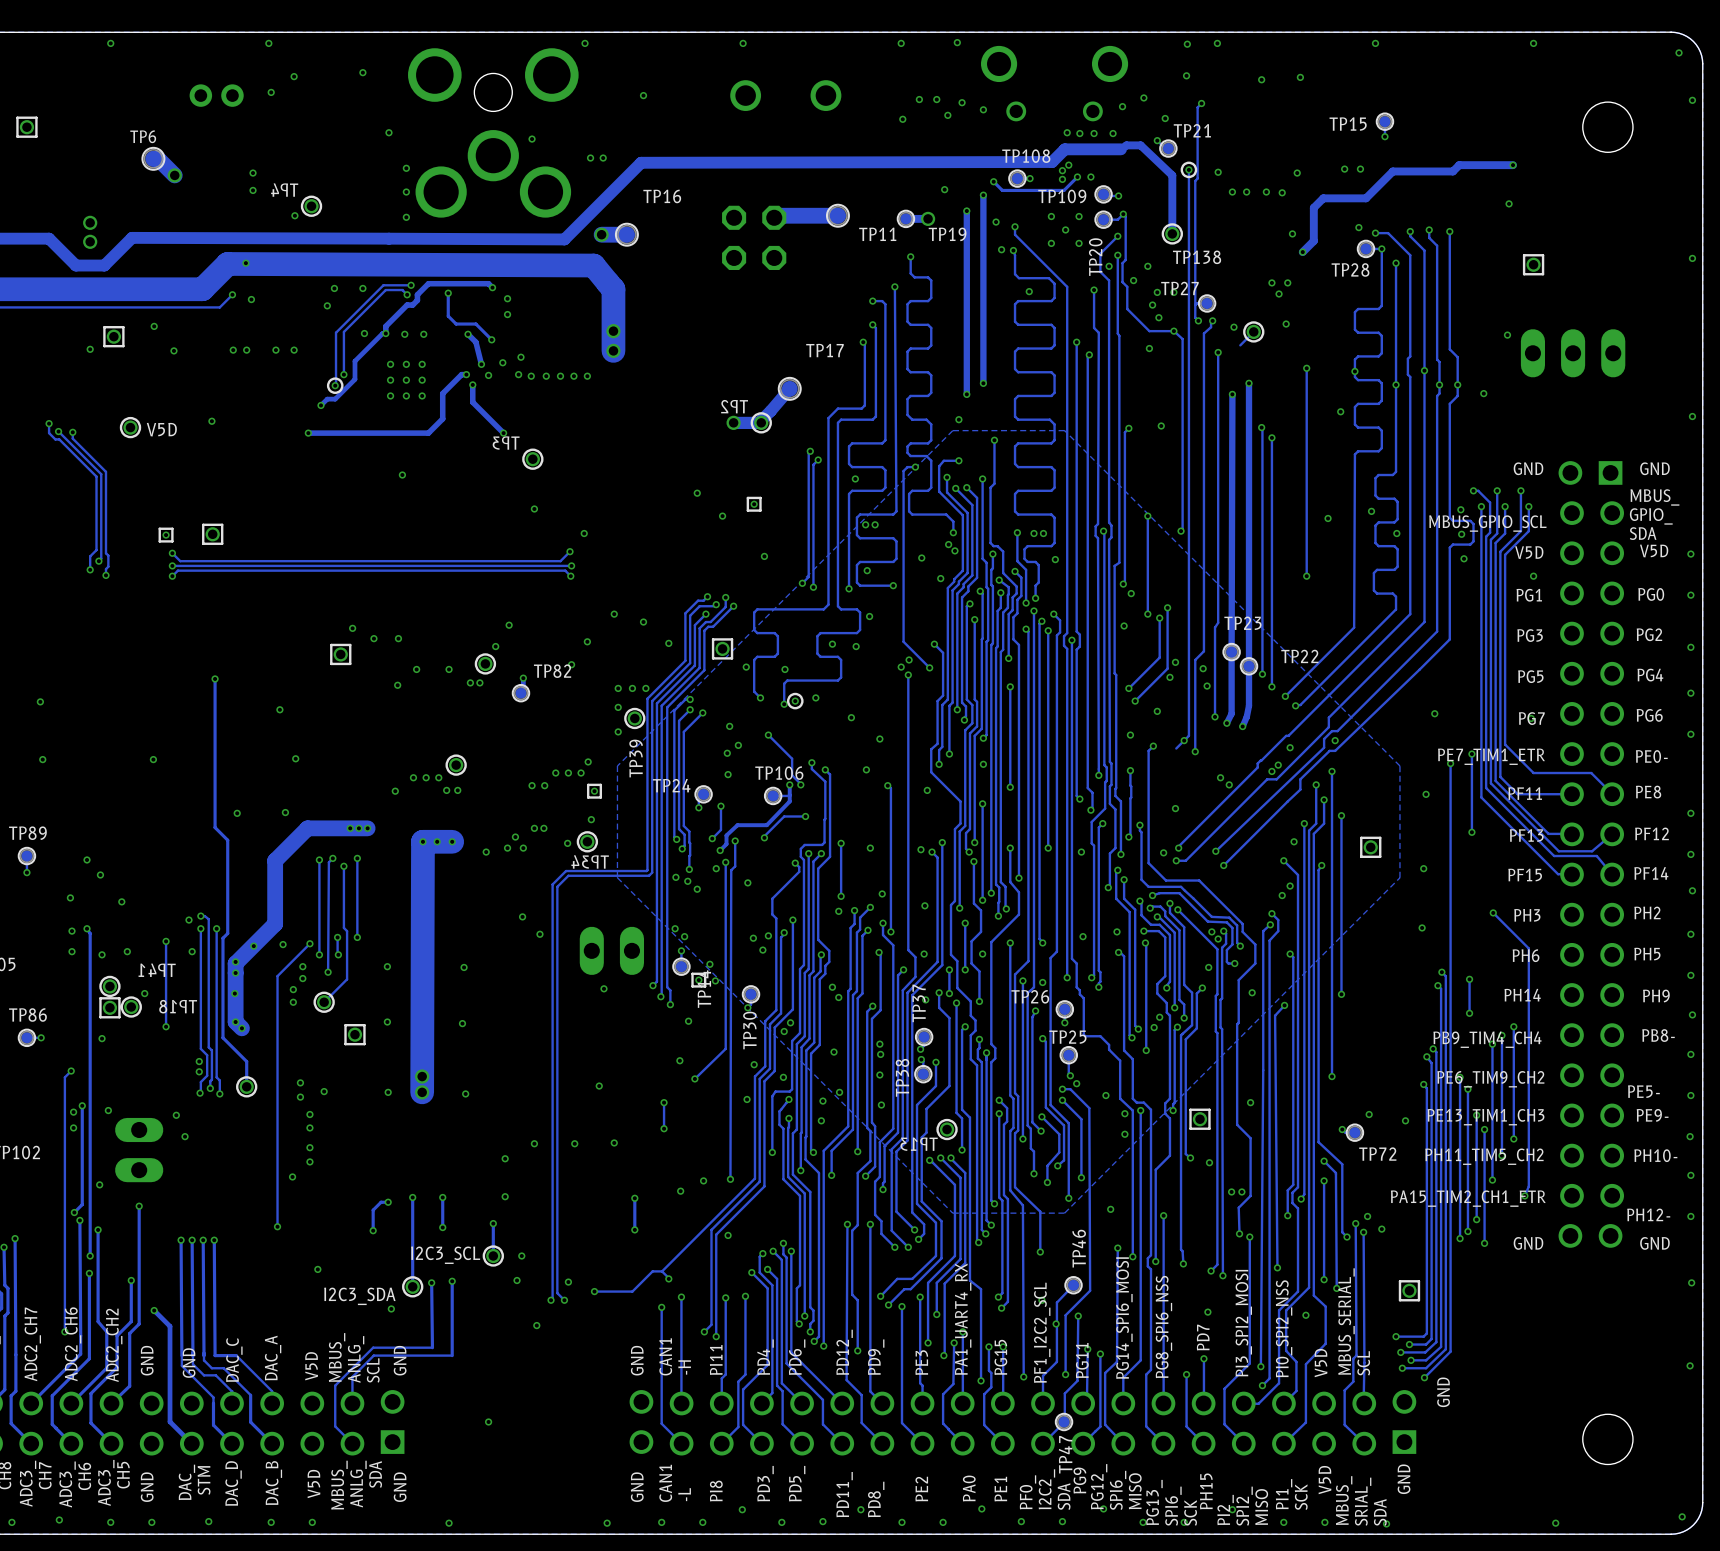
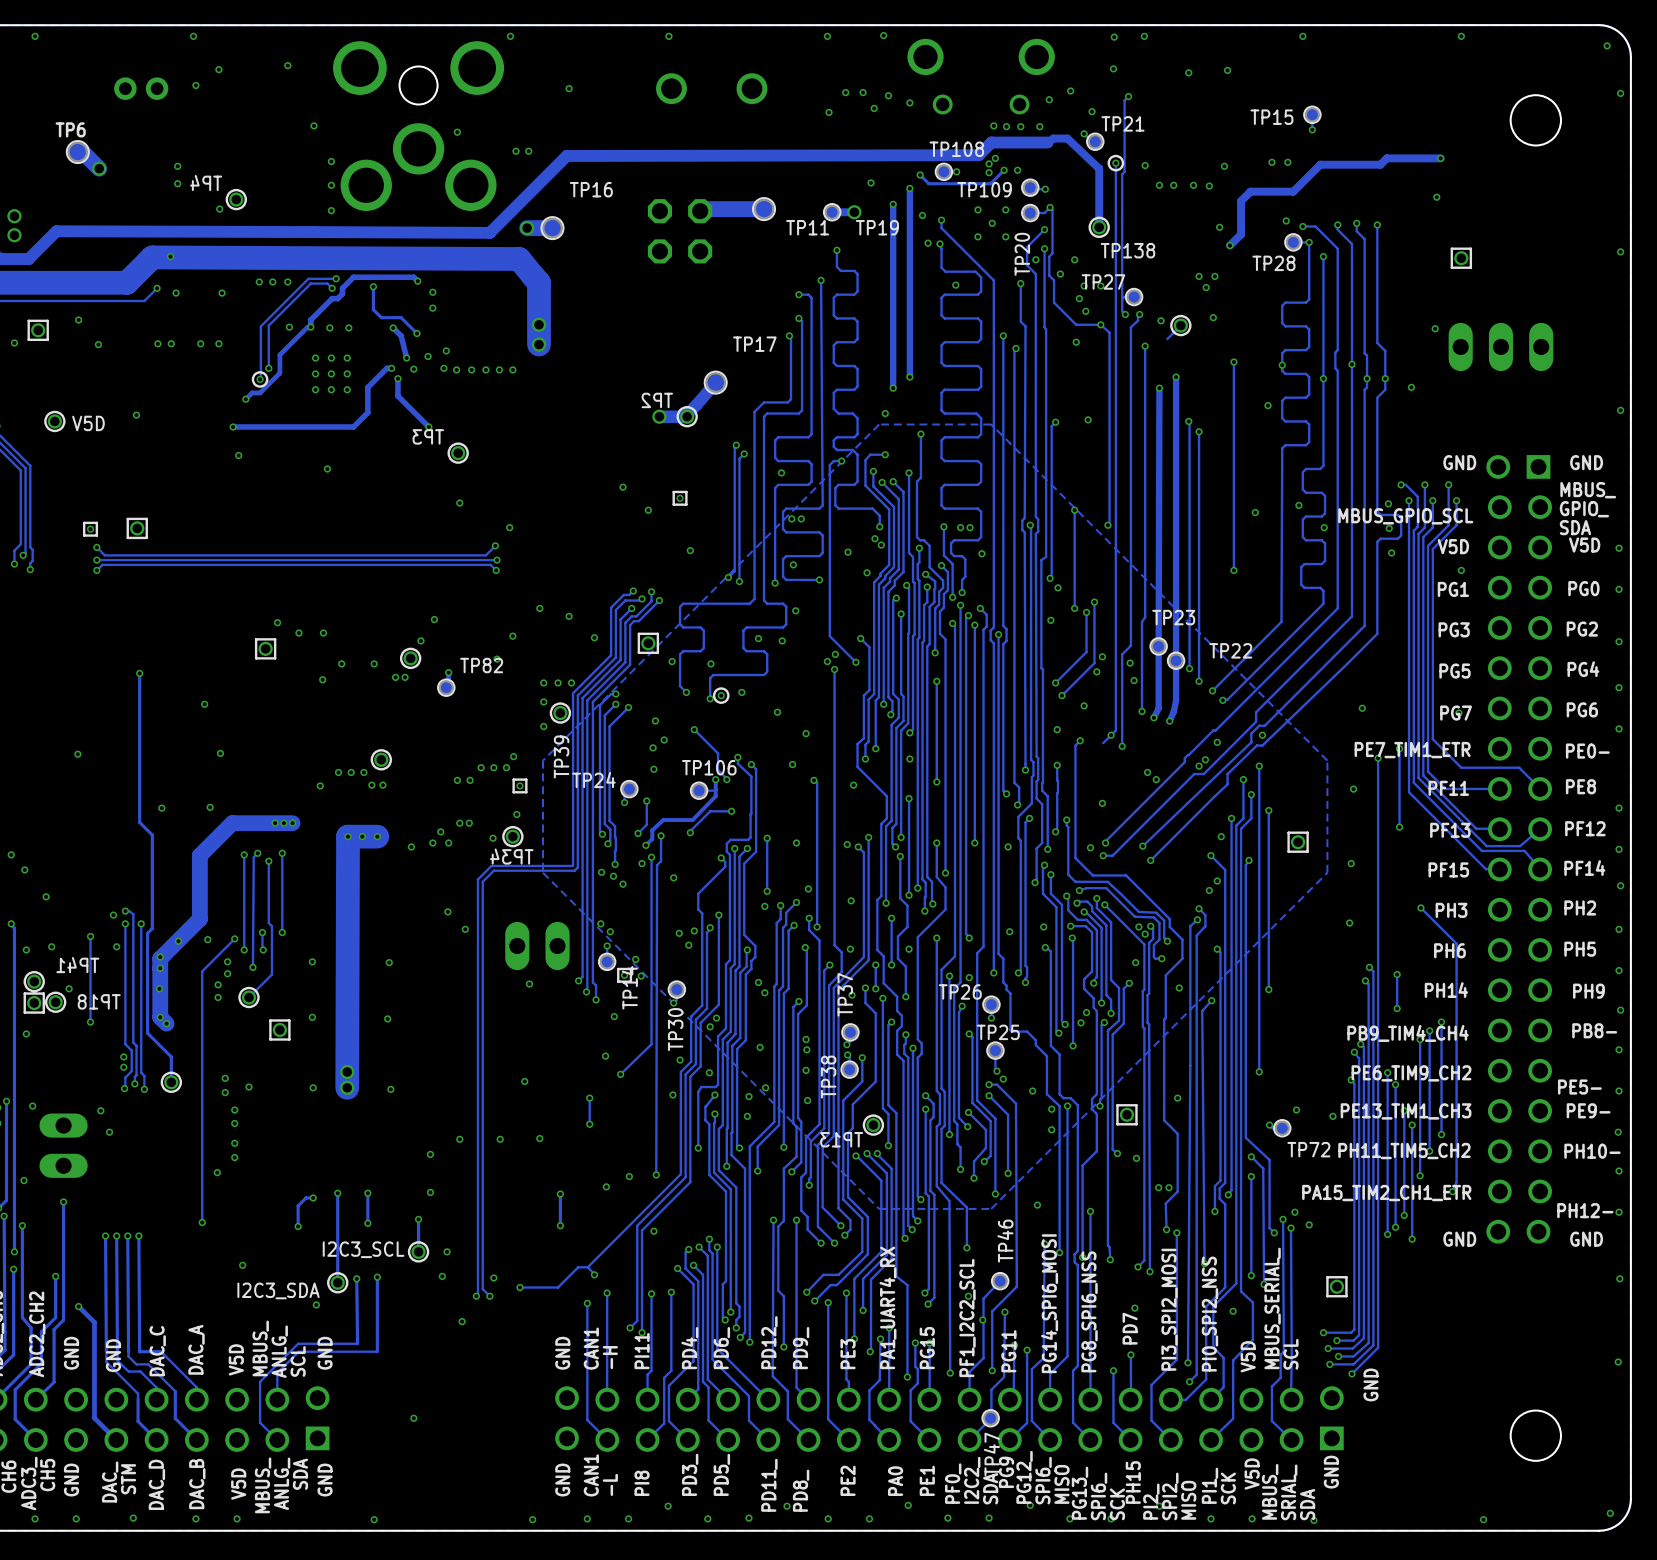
via: none -> (272, 281)
via: none -> (222, 293)
via: (327, 305) -> none
via: none -> (238, 455)

